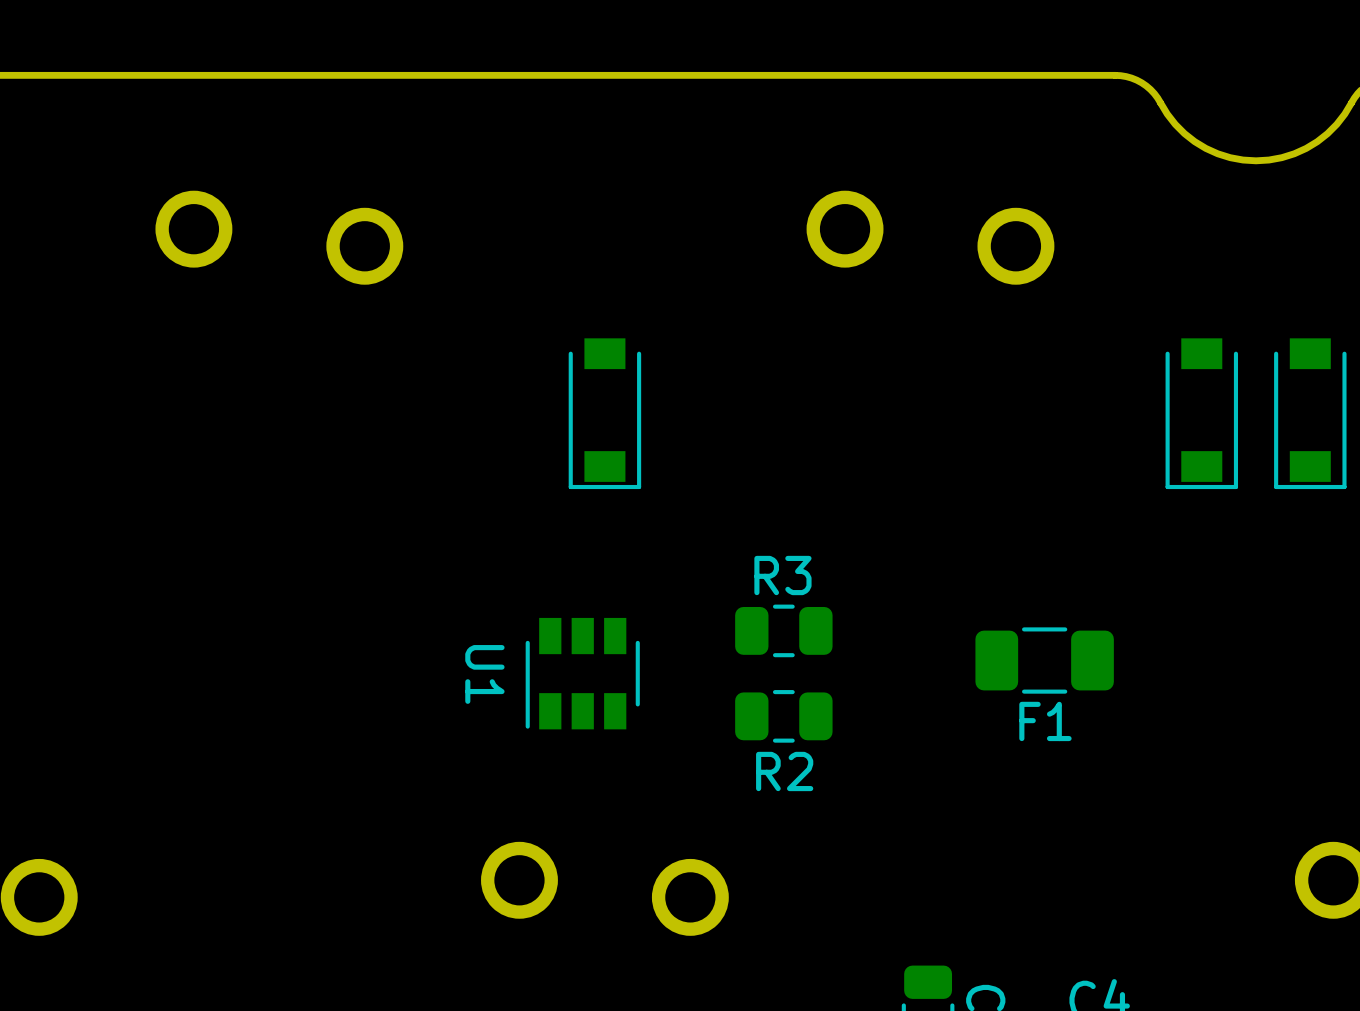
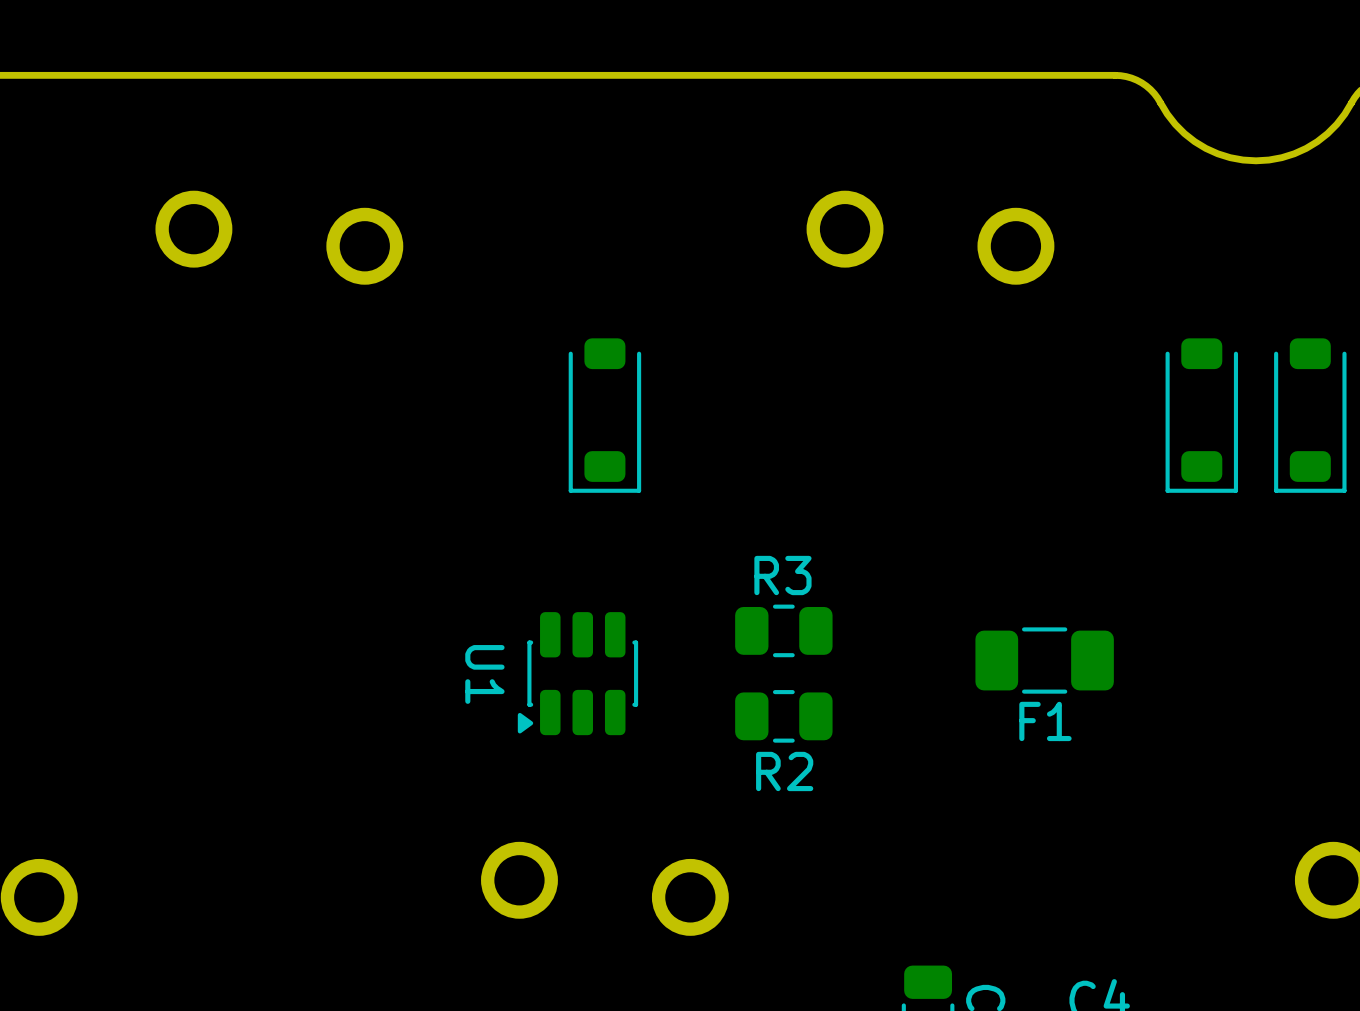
part footprint: [568, 338, 642, 490] -> [568, 338, 642, 493]
part footprint: [1165, 338, 1239, 490] -> [1165, 338, 1239, 493]
part footprint: [1274, 338, 1347, 490] -> [1274, 338, 1347, 493]
U1 footprint: [525, 617, 640, 730] -> [517, 612, 639, 736]

